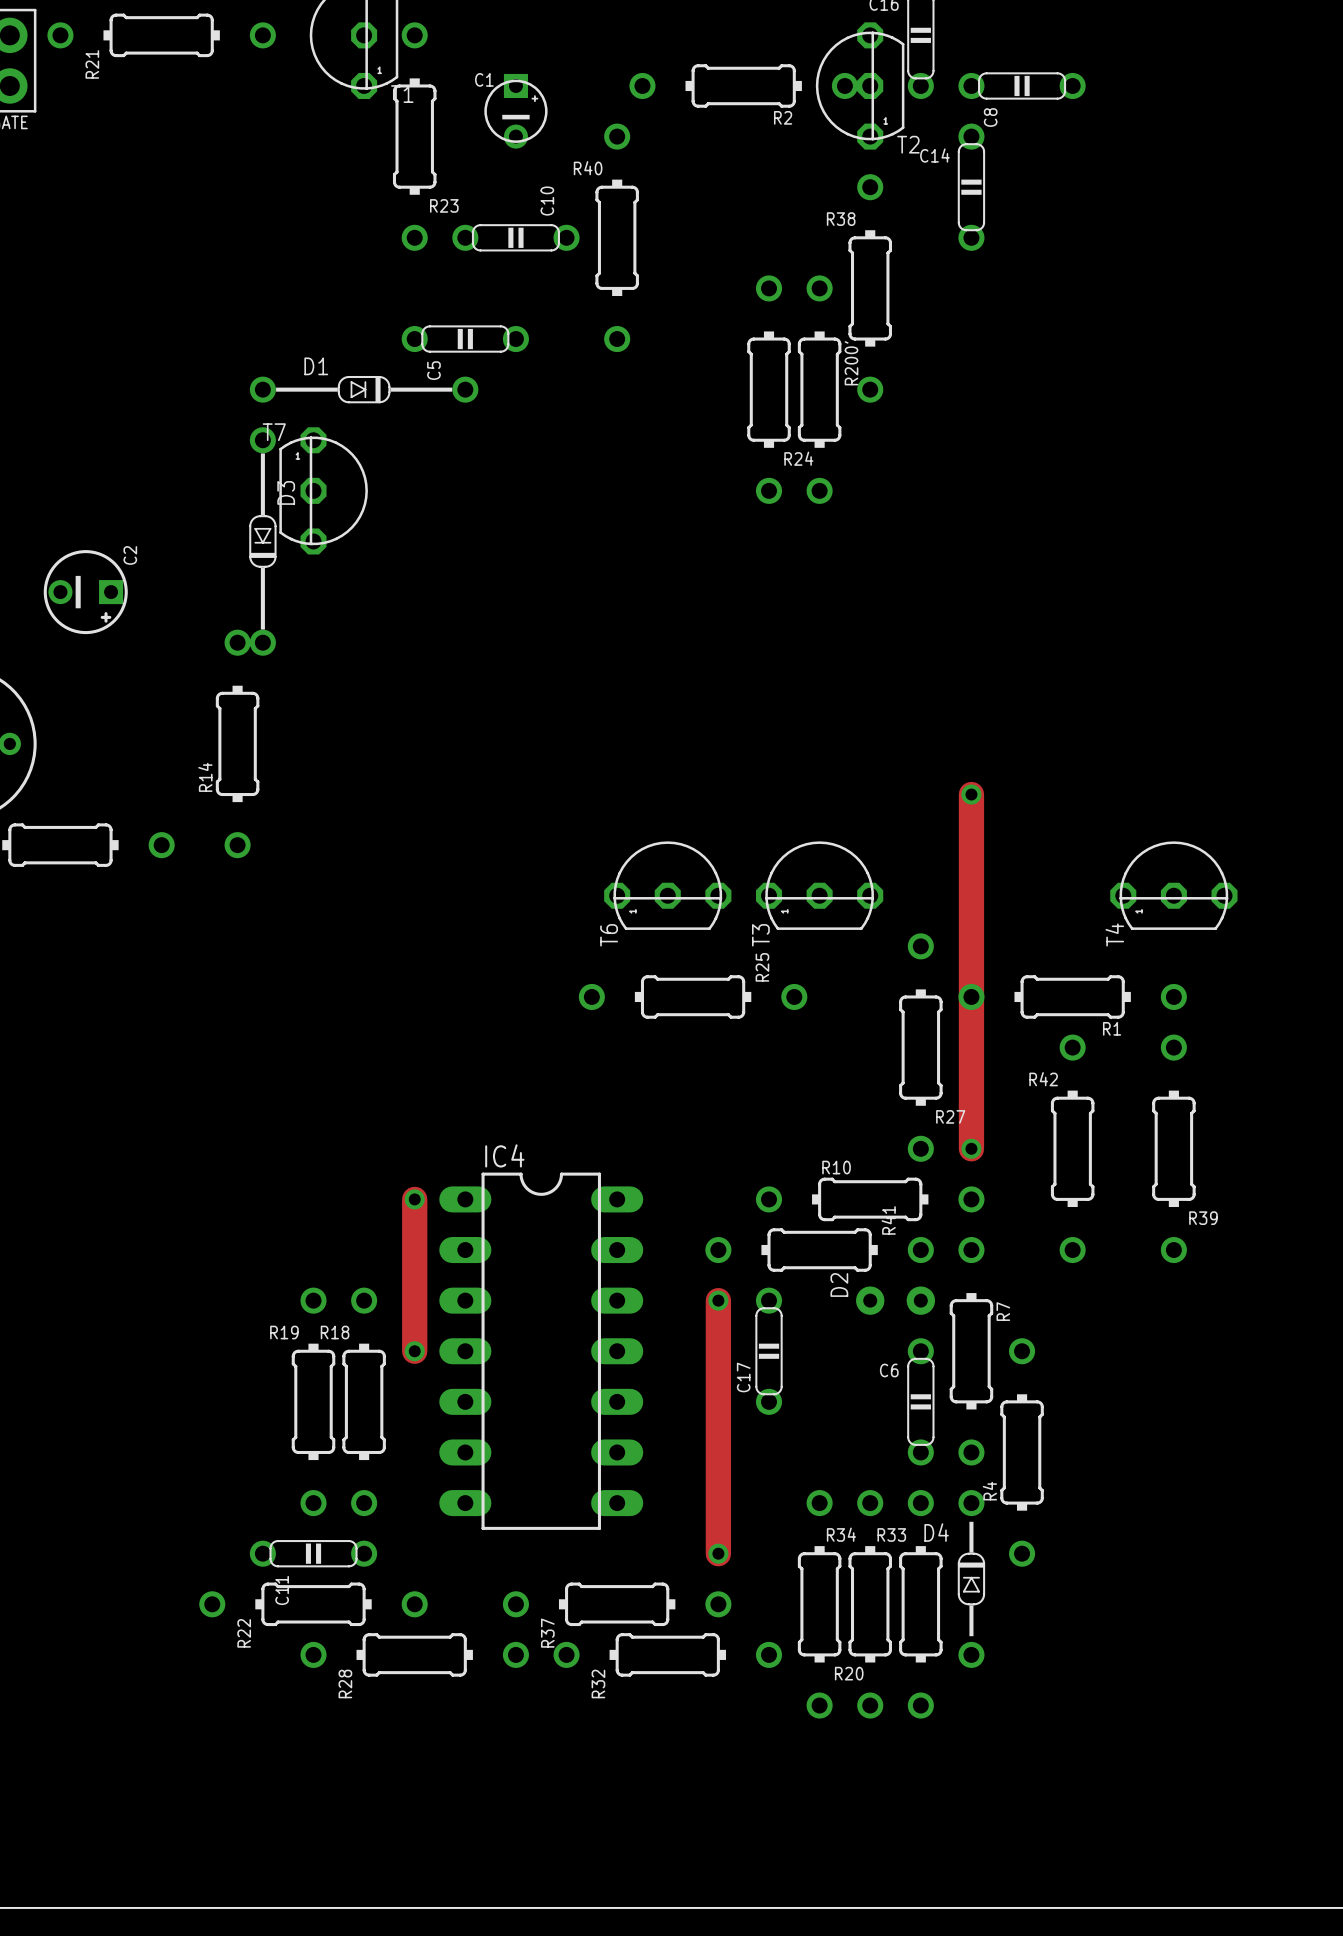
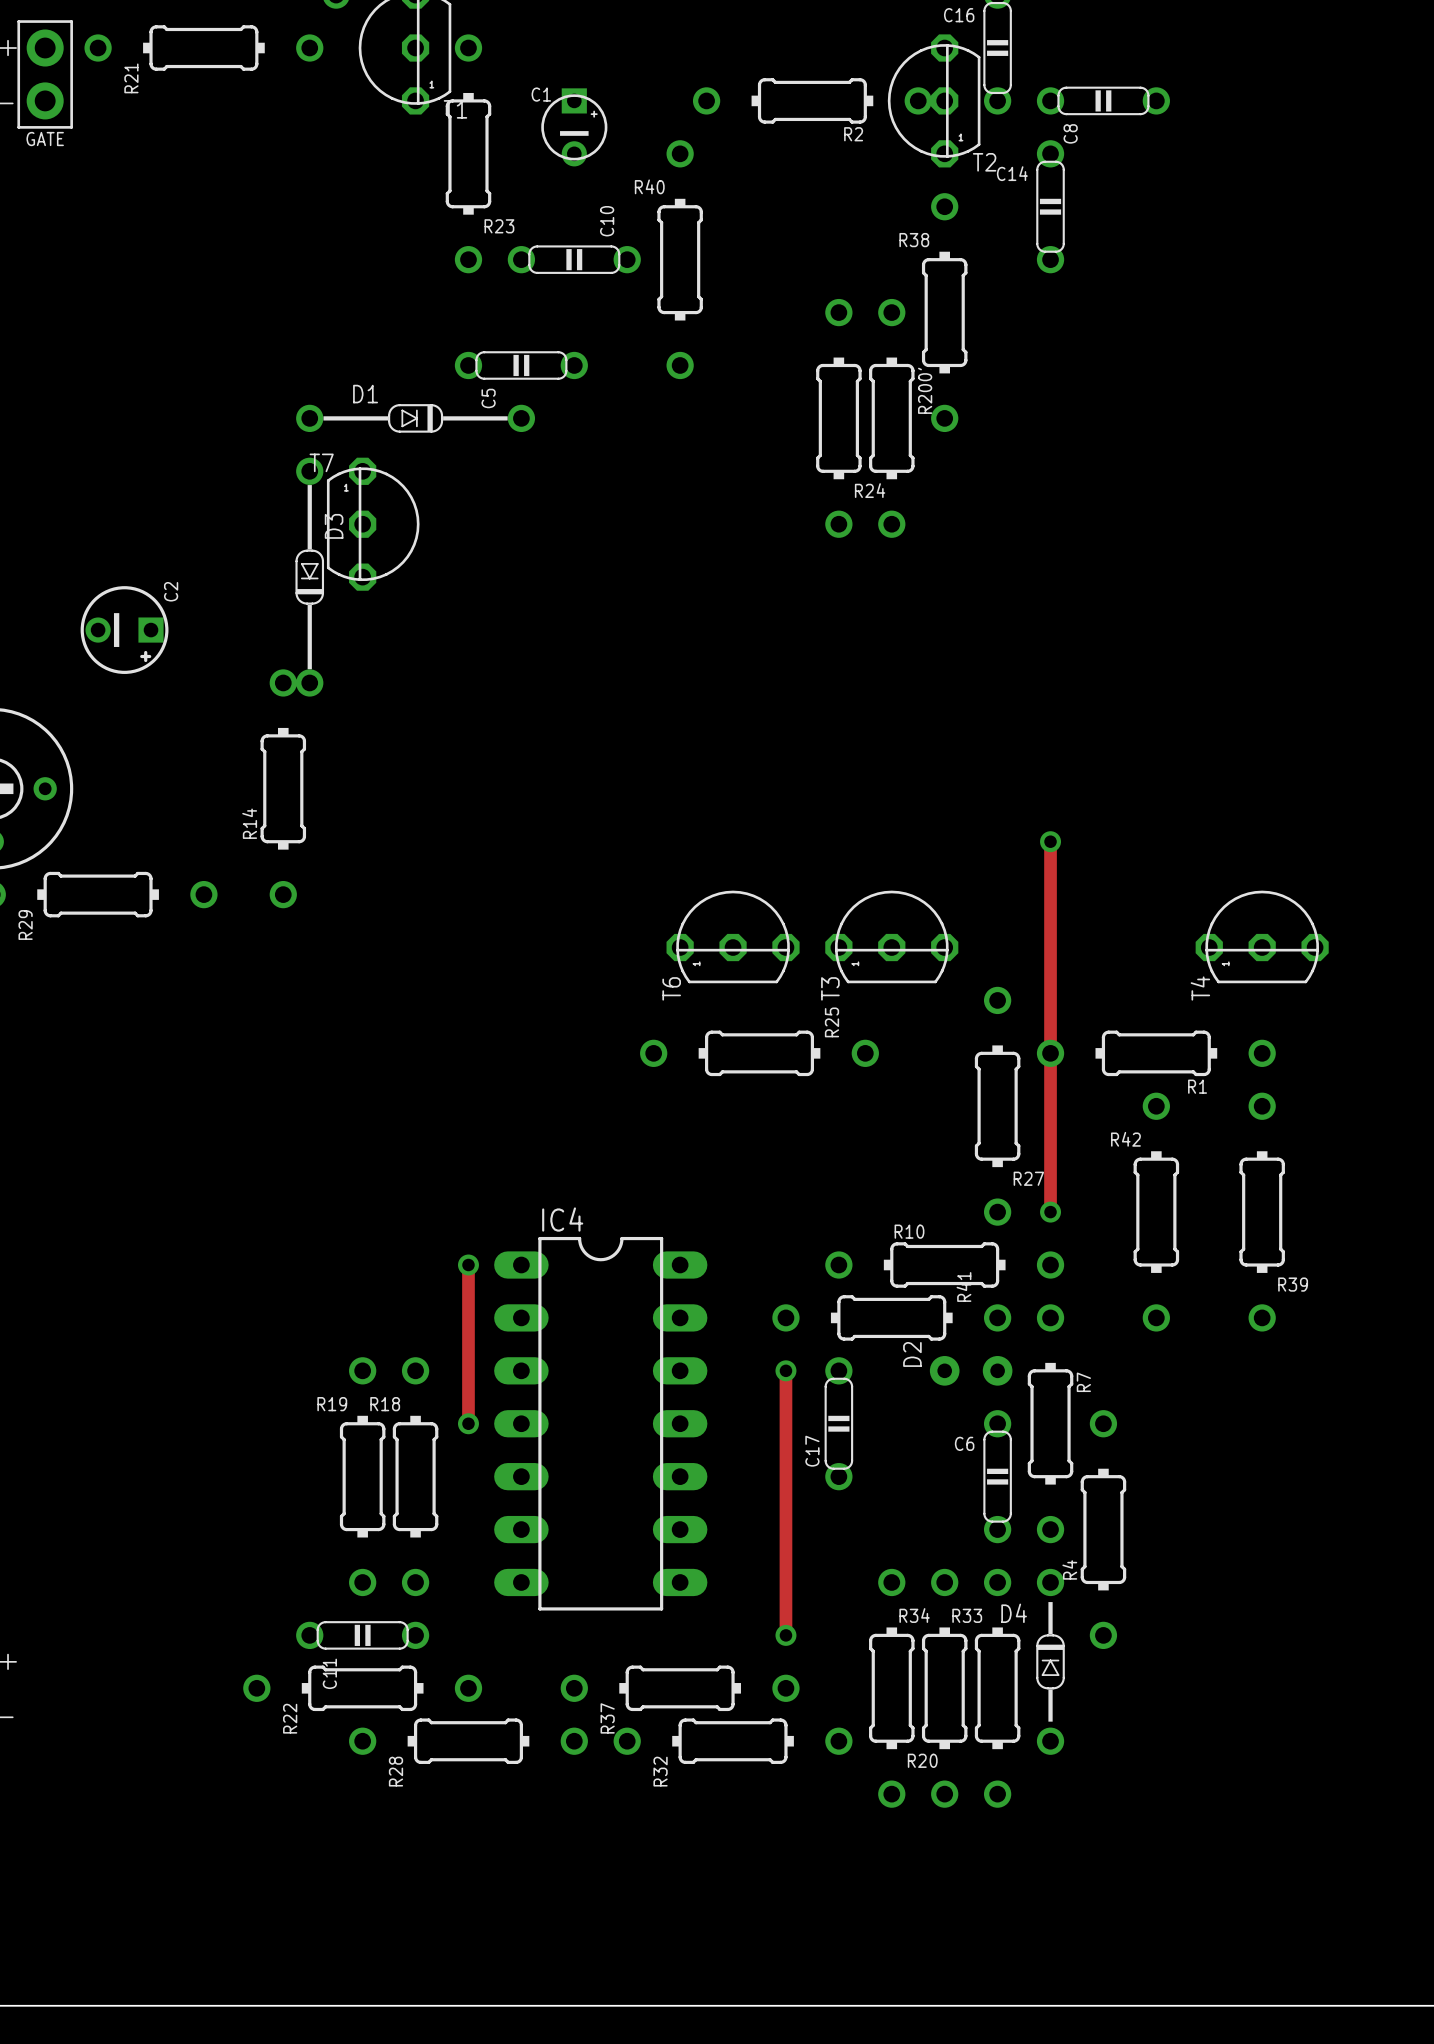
track width: thick (971, 794) (971, 1148) -> thin (1050, 841) (1050, 1212)
track width: thick (414, 1199) (414, 1351) -> thin (468, 1265) (468, 1423)
track width: thick (718, 1300) (718, 1553) -> thin (785, 1370) (785, 1635)

